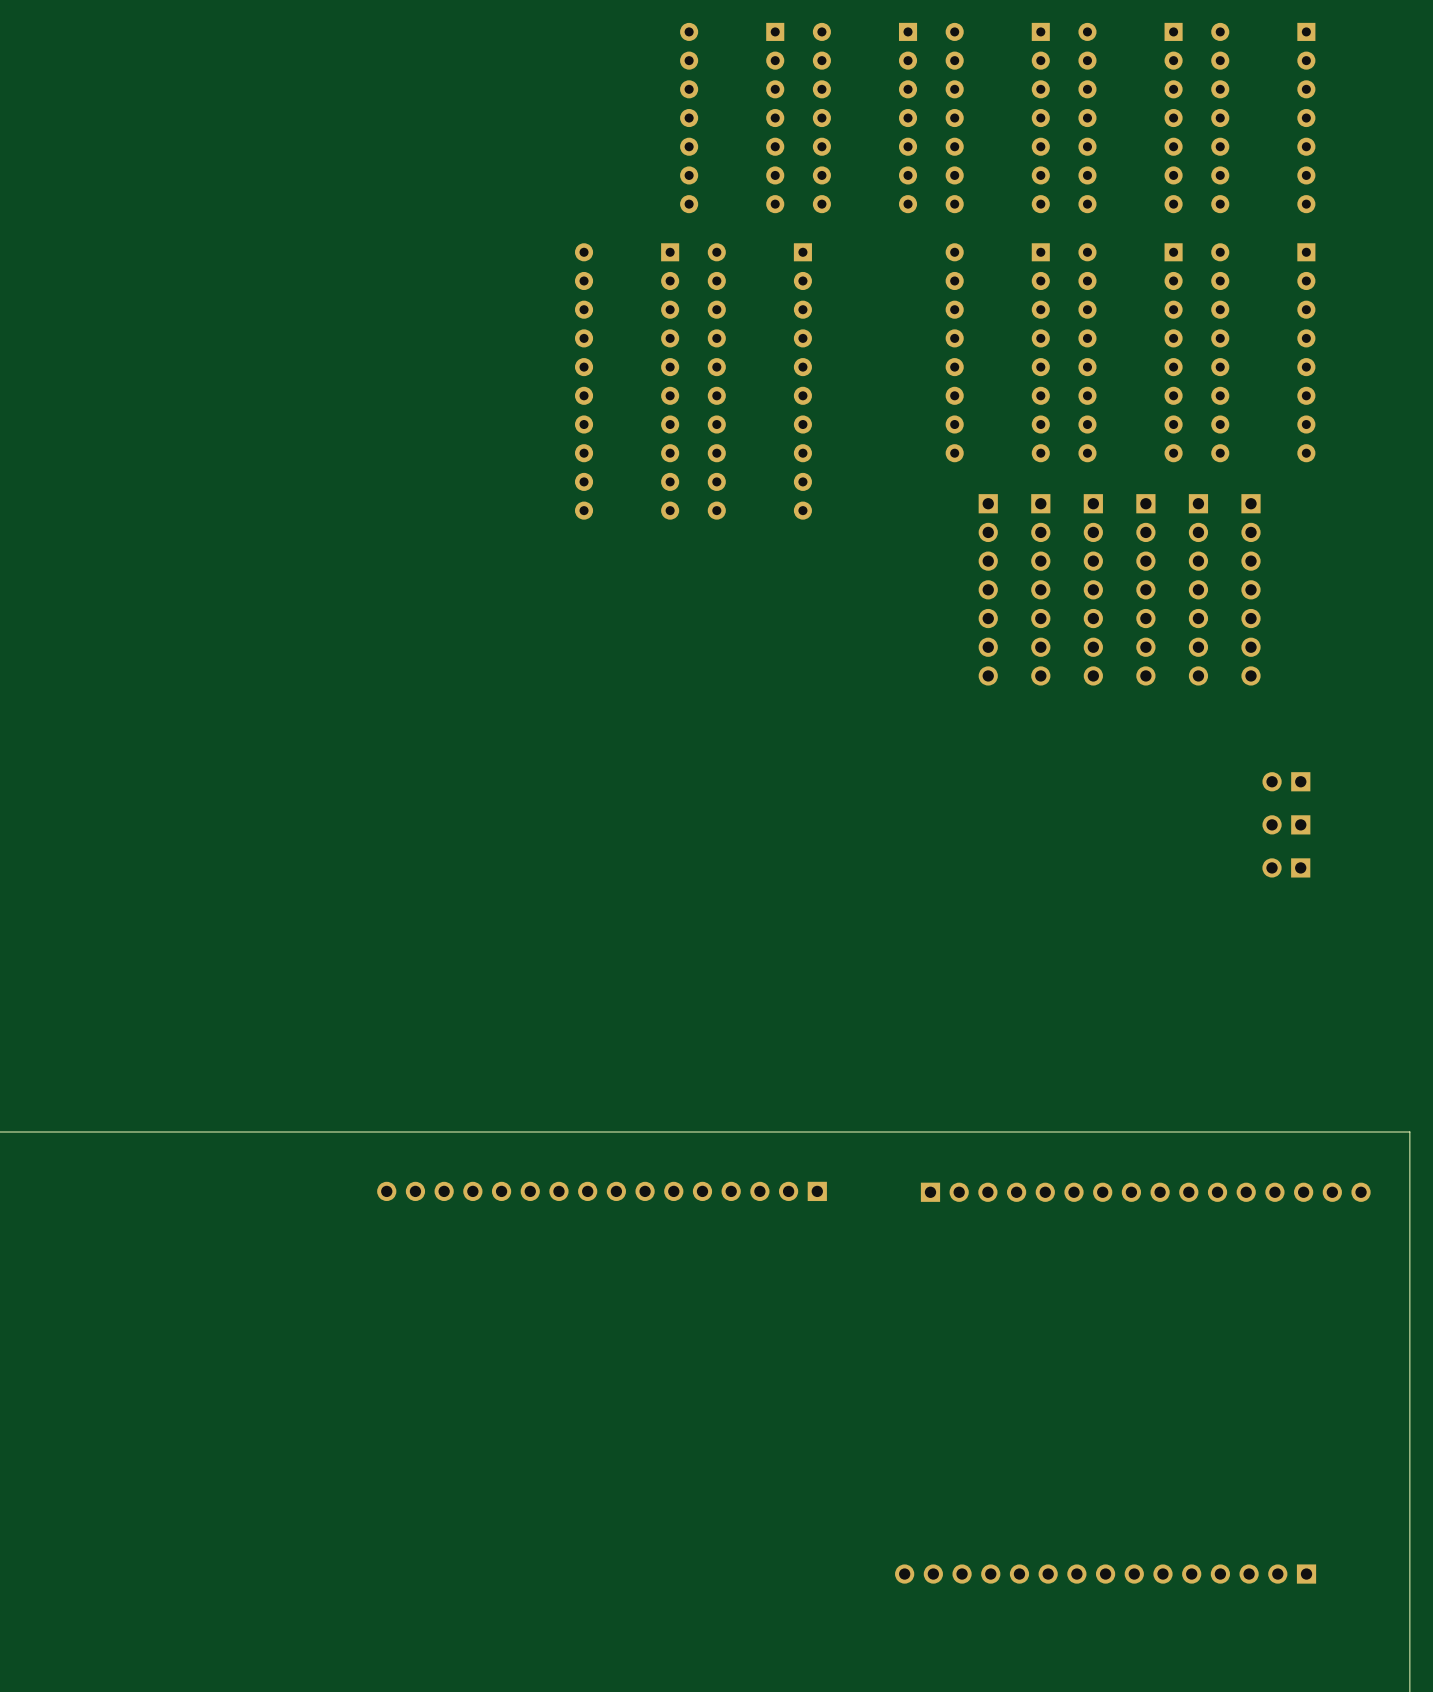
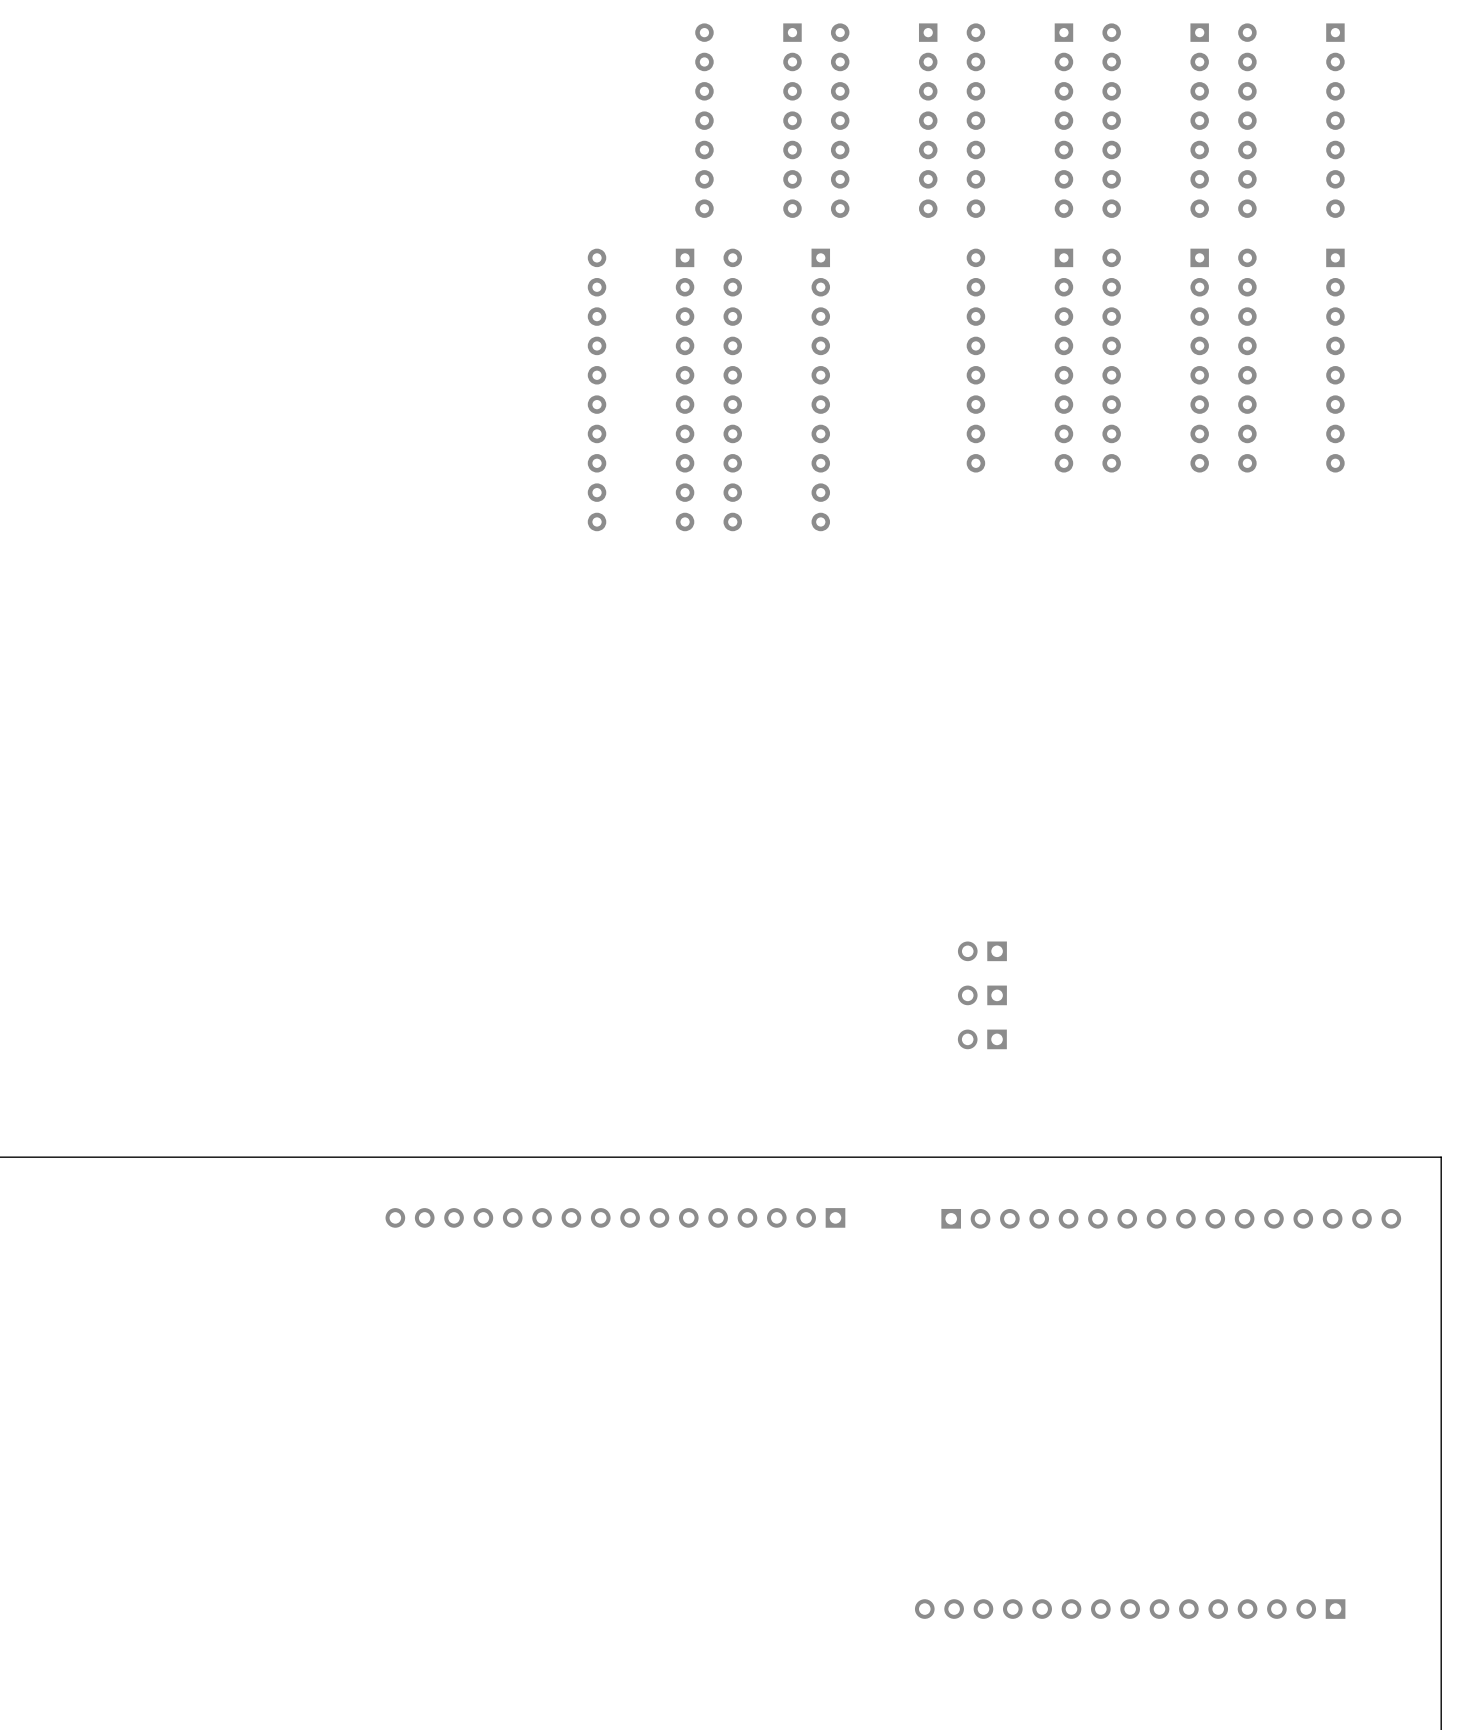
part: (988, 589) -> none
part: (1040, 589) -> none
part: (1093, 589) -> none
part: (1145, 589) -> none
part: (1198, 589) -> none
part: (1251, 589) -> none
part: (1286, 781) -> none
part: (1286, 824) -> none
part: (1286, 867) -> none
part: none -> (982, 951)
part: none -> (982, 995)
part: none -> (982, 1039)

